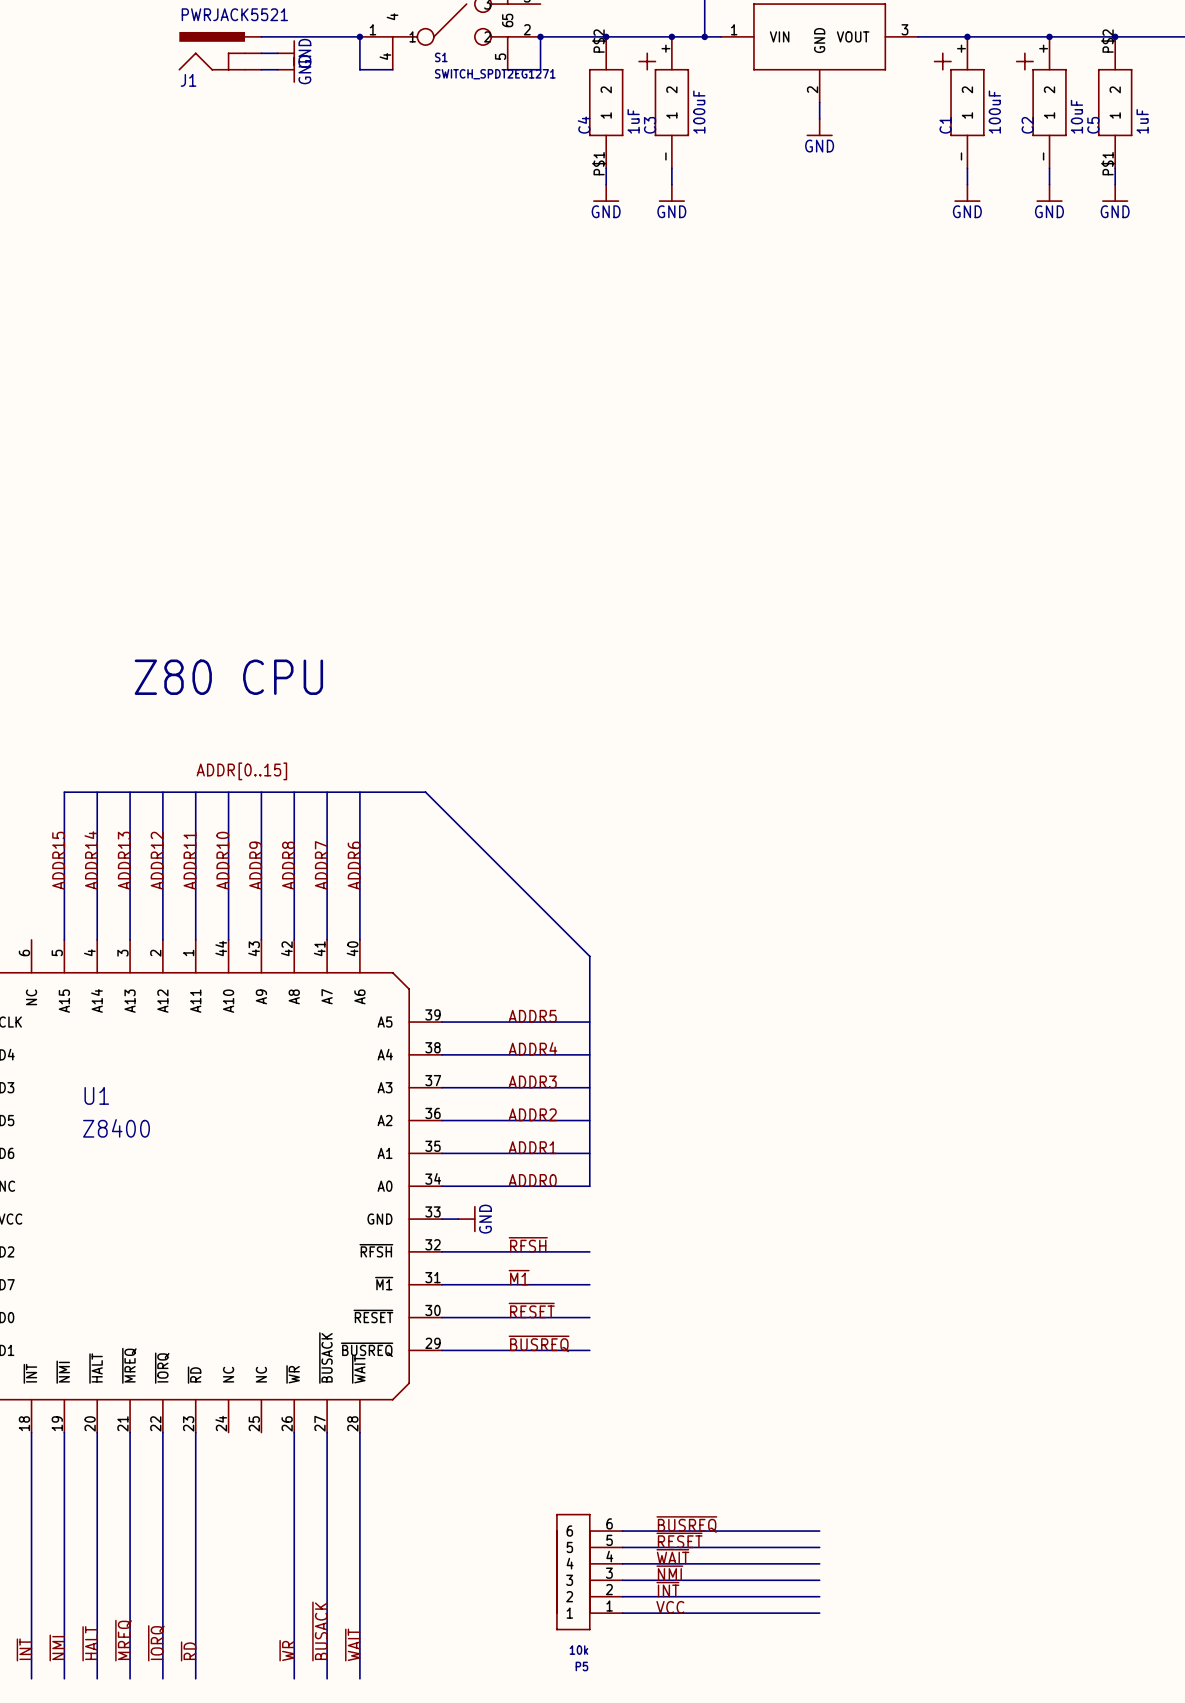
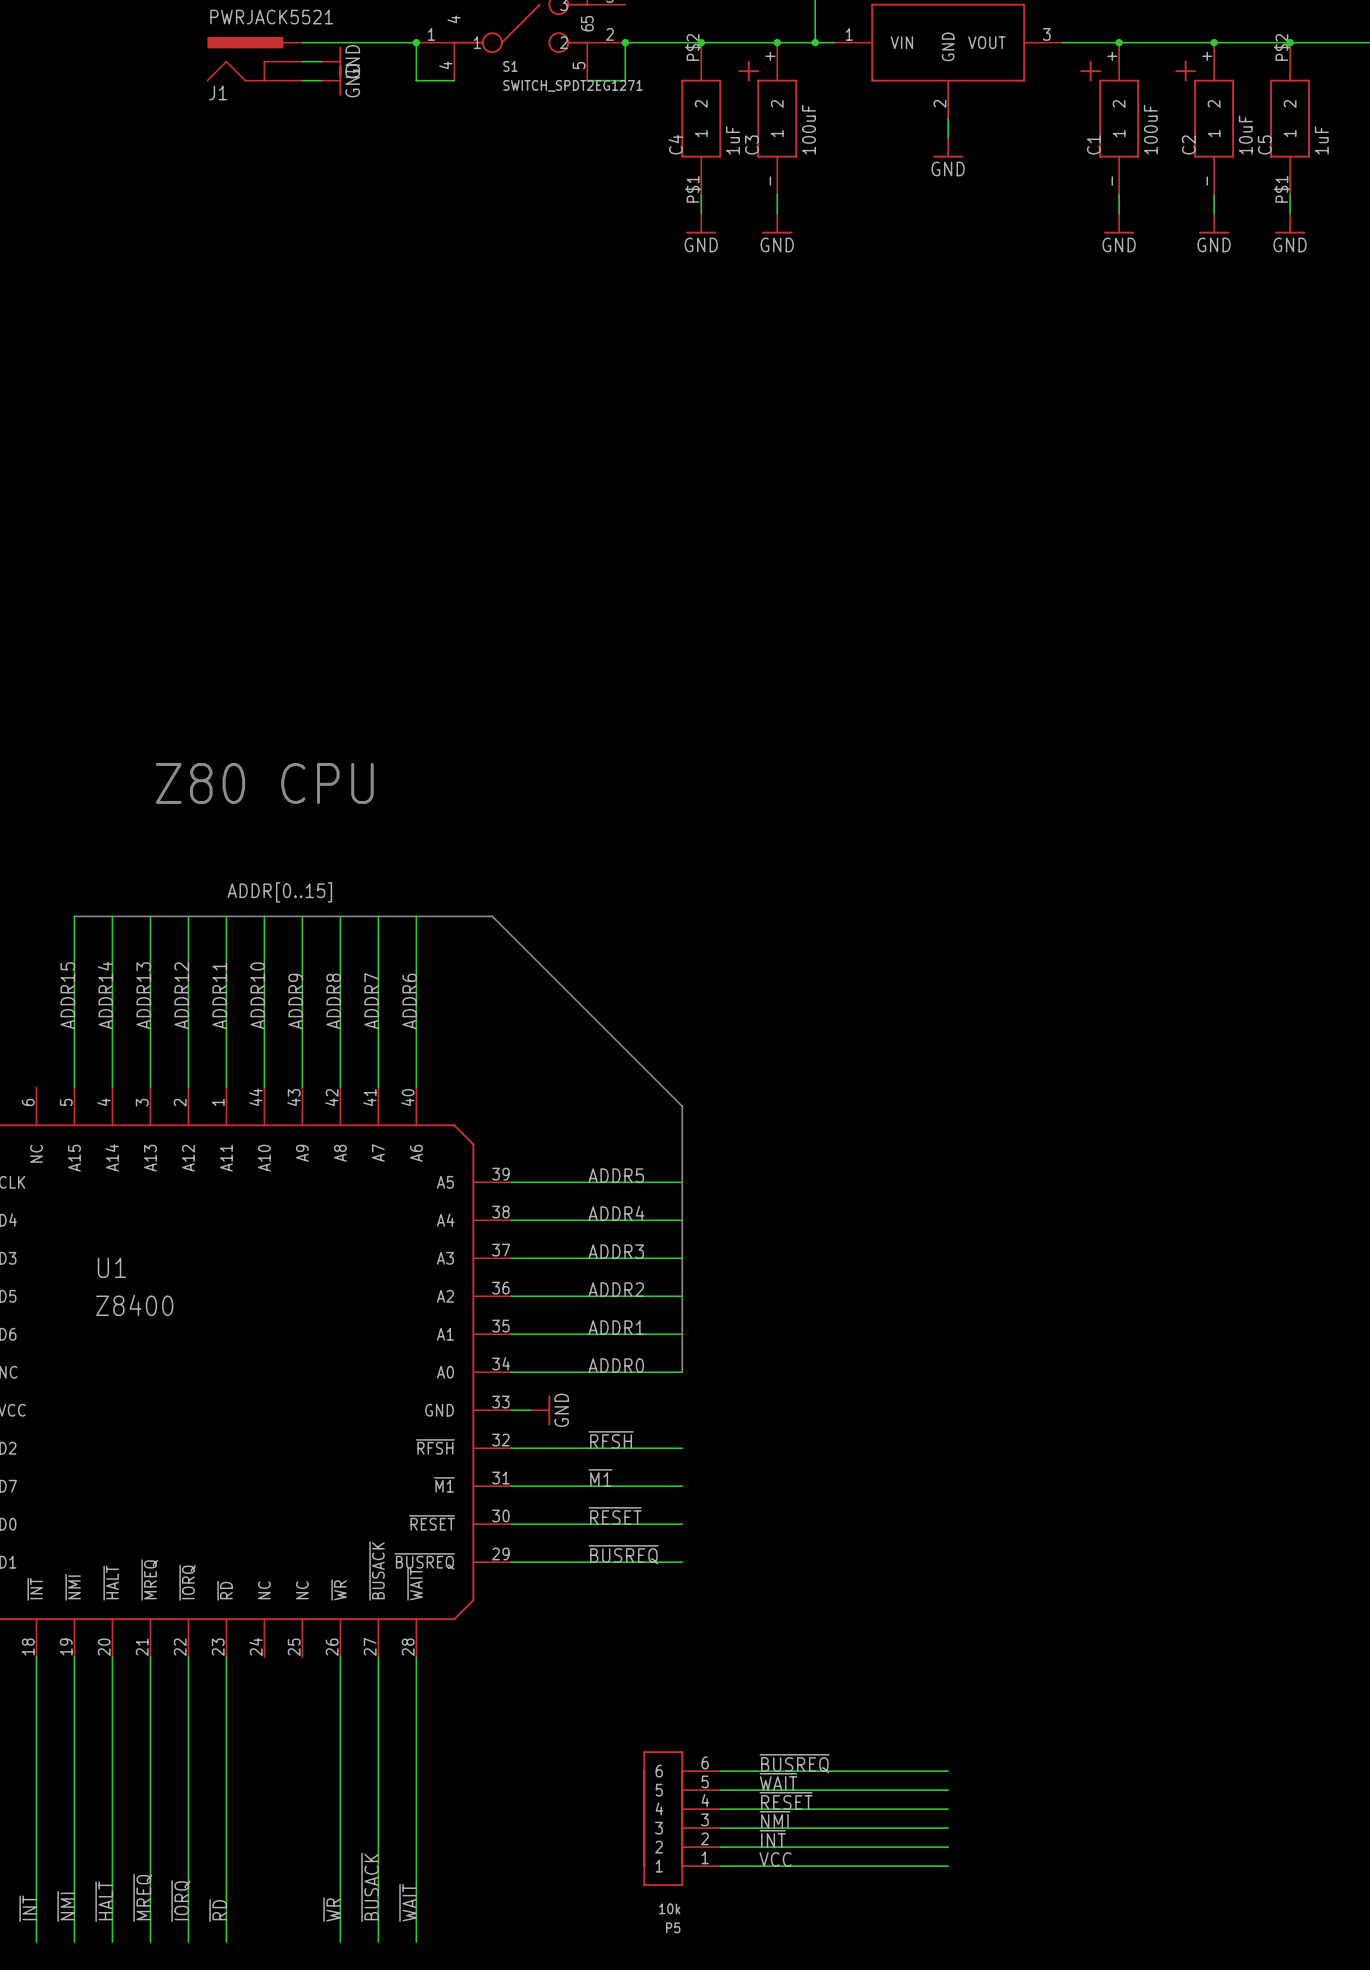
label: ~{RESET} (679, 1540) -> ~{WAIT} (778, 1781)
label: ~{WAIT} (672, 1556) -> ~{RESET} (786, 1800)

